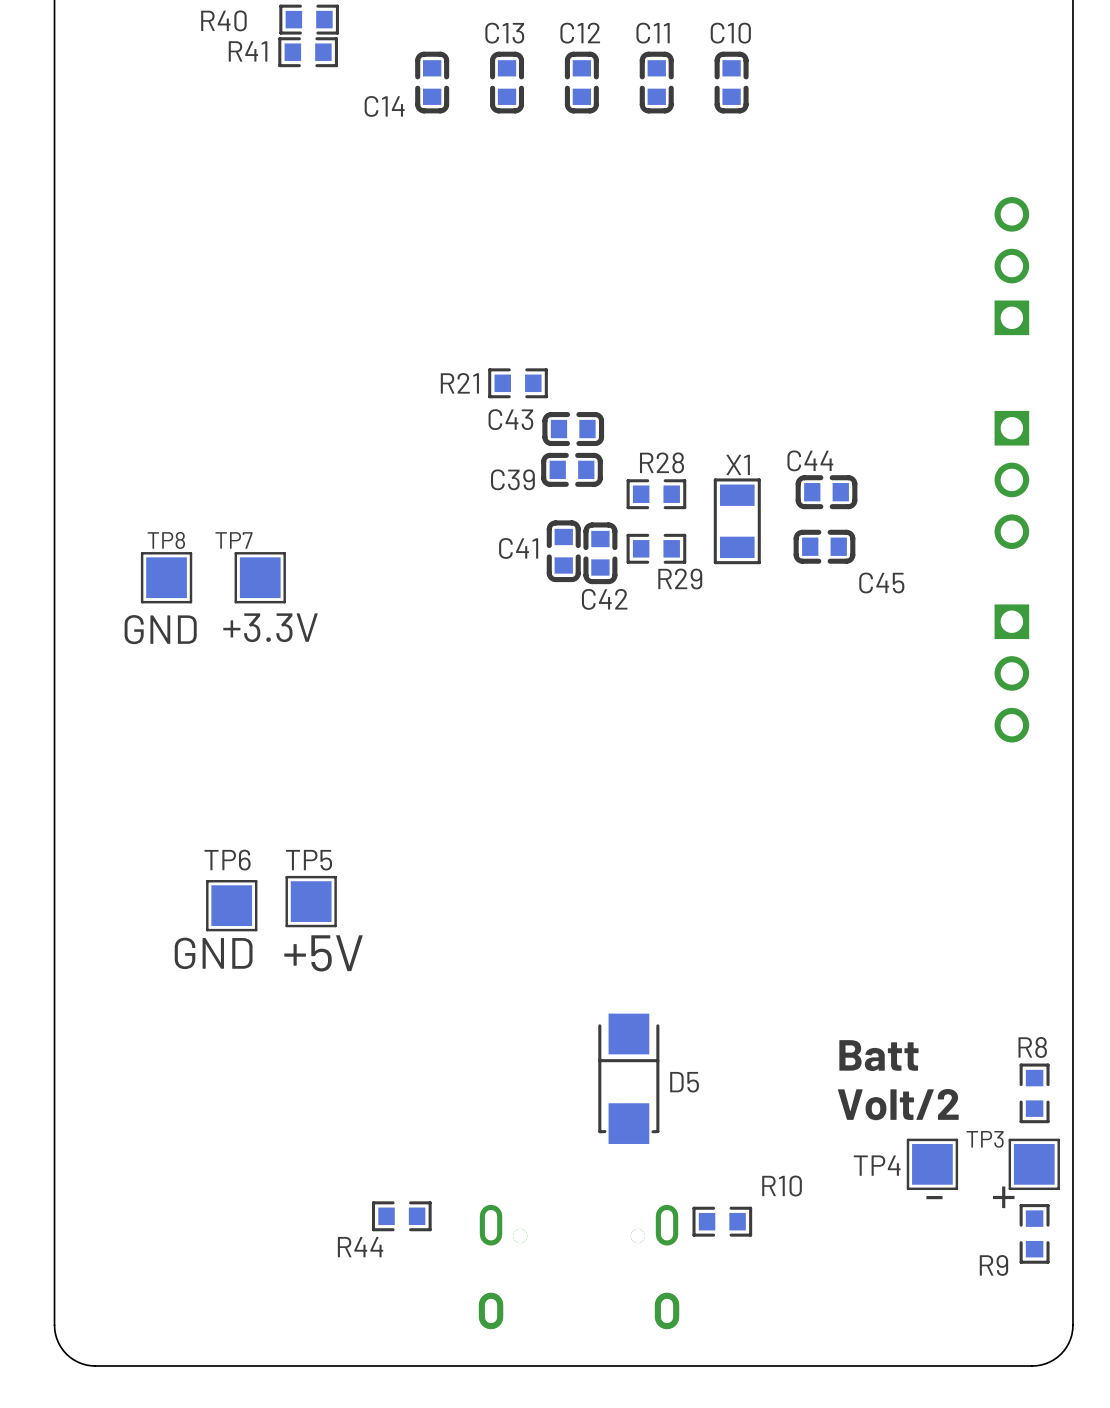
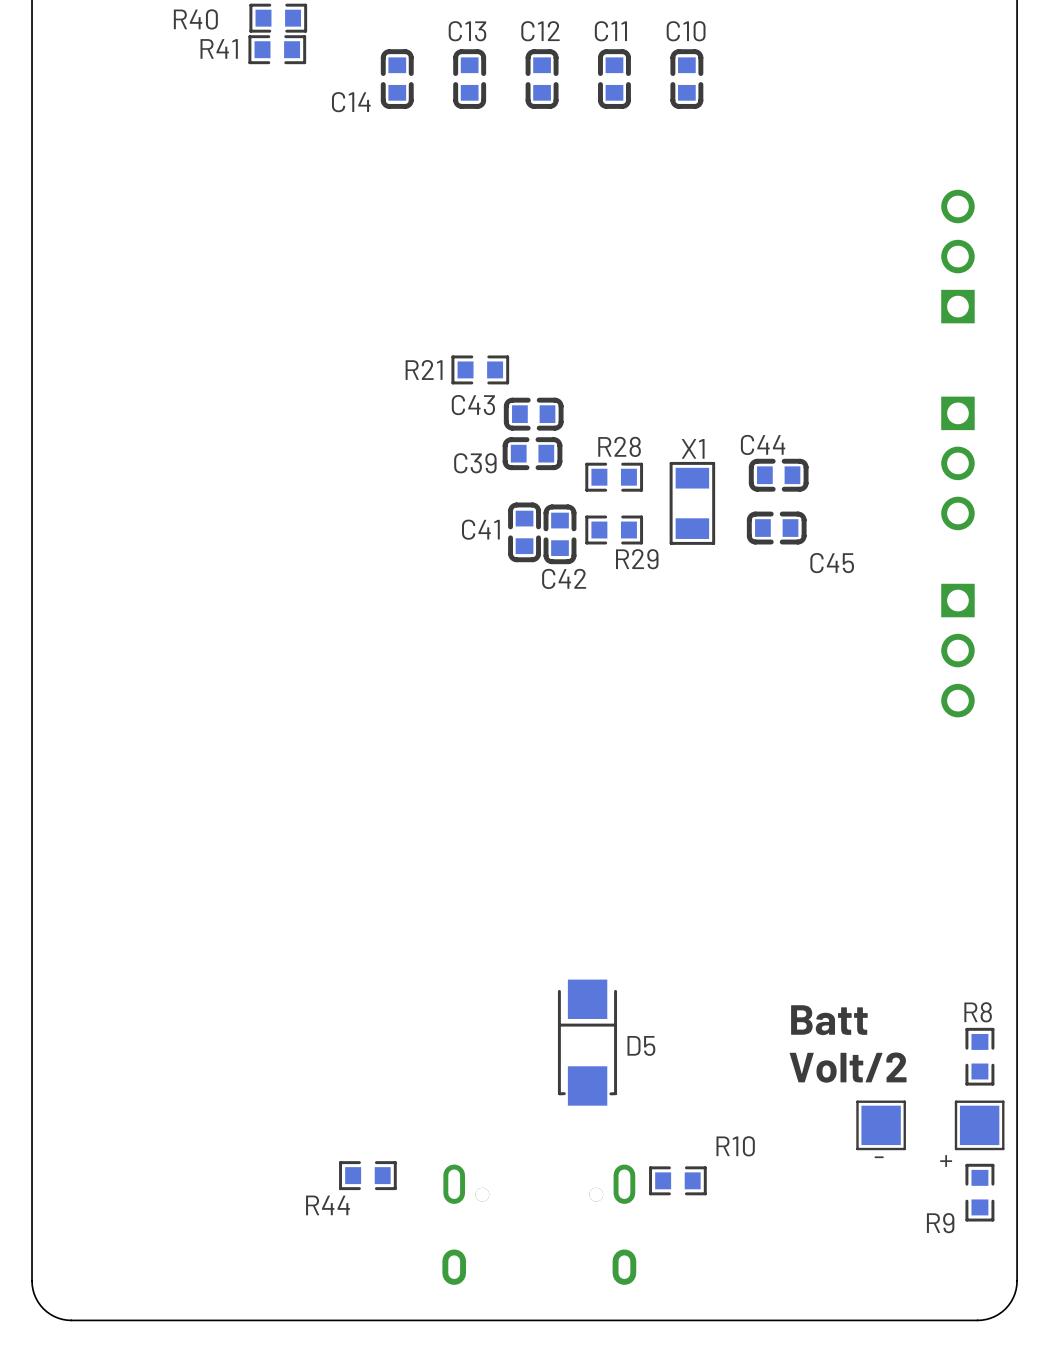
TP8: (166, 577) -> none
TP7: (260, 577) -> none
text: +3.3V (270, 627) -> none
text: GND (160, 629) -> none
TP5: (311, 901) -> none
TP6: (231, 905) -> none
text: GND (213, 953) -> none
text: +5V (323, 953) -> none
TP3 name: TP3 (985, 1139) -> + (946, 1161)
TP4 name: TP4 (877, 1165) -> - (879, 1157)
text: - (934, 1197) -> none
text: + (1003, 1197) -> none

